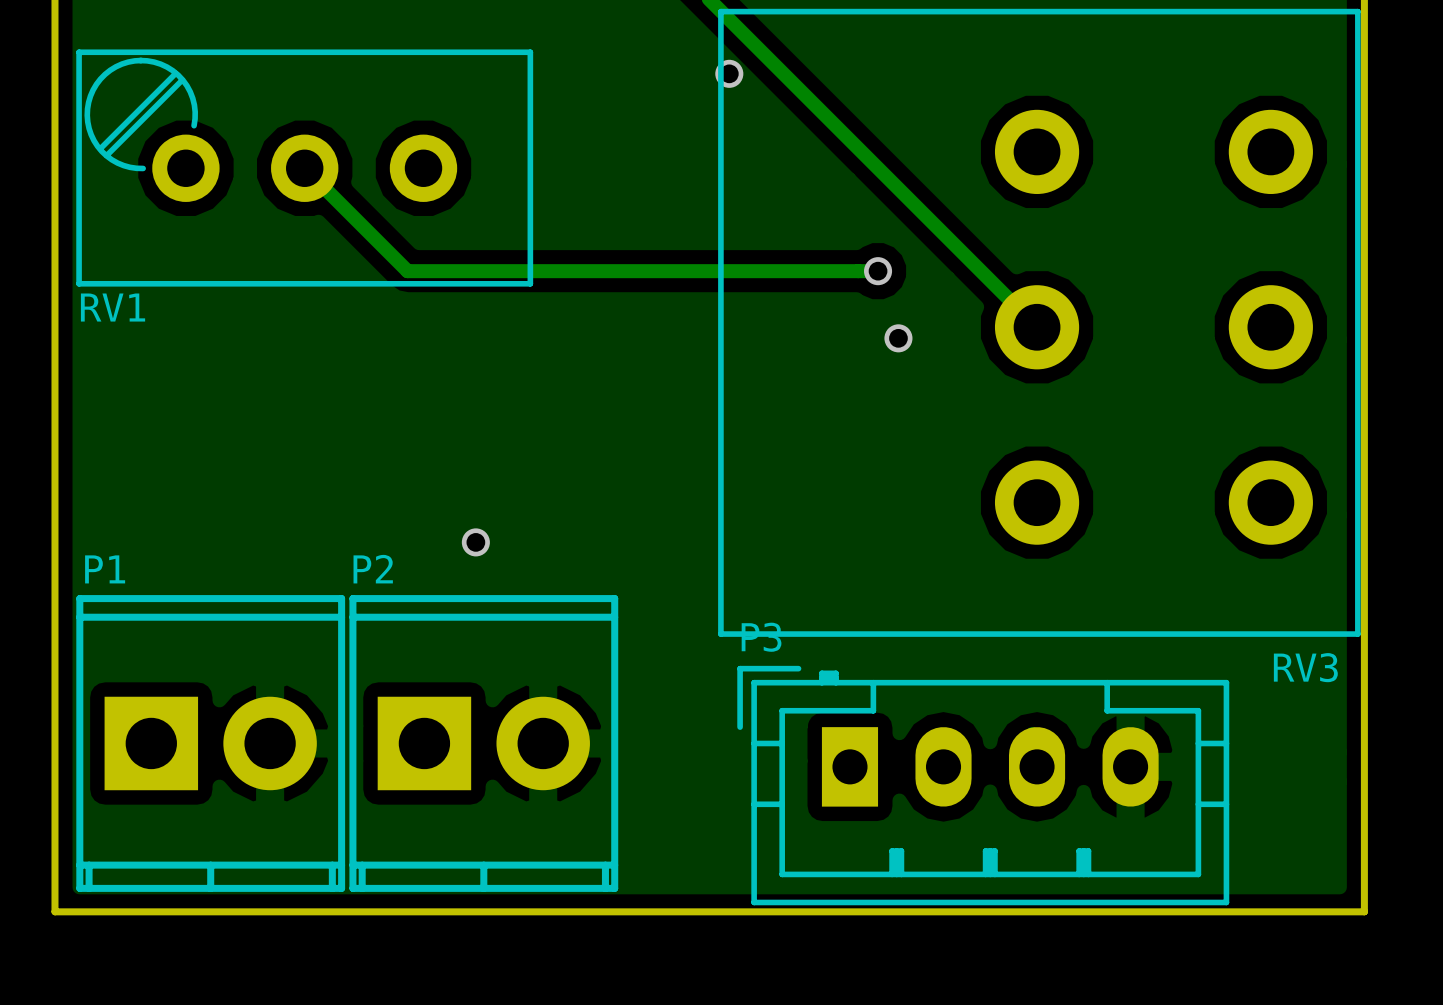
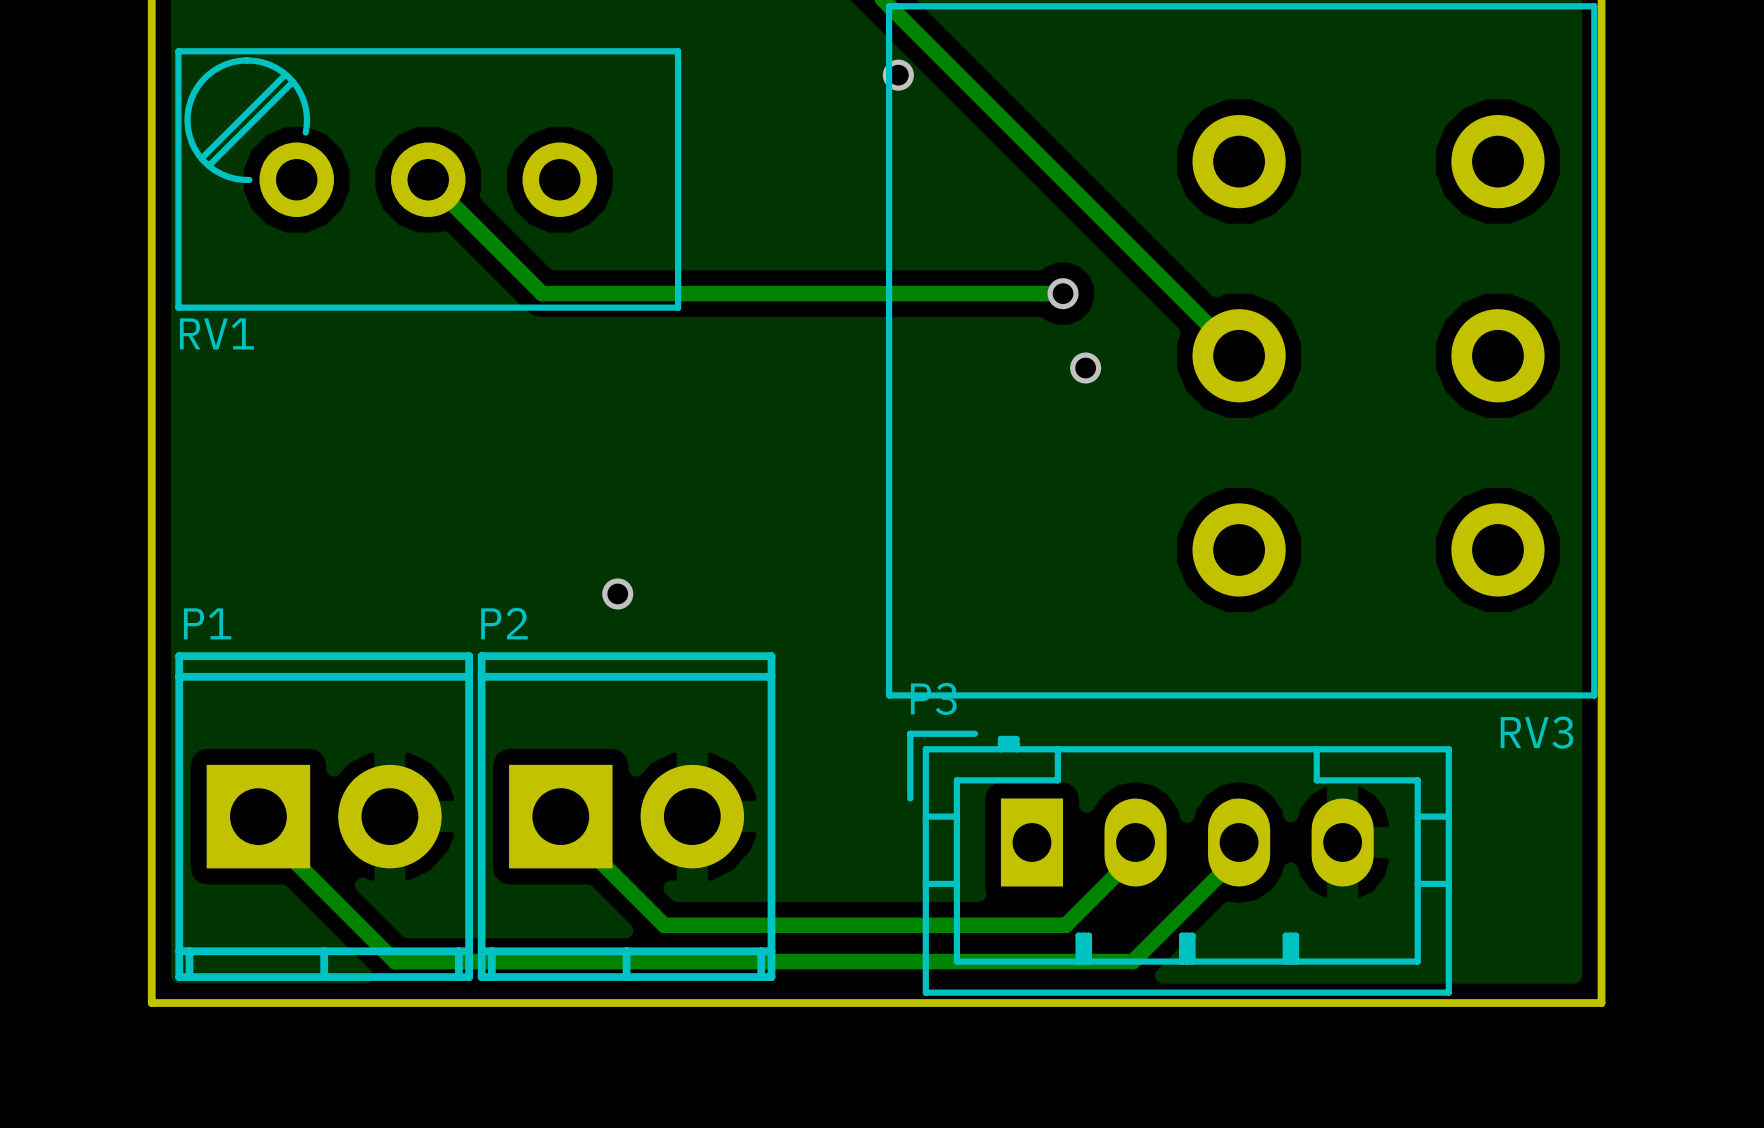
track: none -> (258, 816) (258, 824) (395, 961) (1132, 961) (1239, 855) (1239, 842)
track: none -> (560, 816) (560, 821) (664, 925) (1065, 925) (1135, 855) (1135, 842)

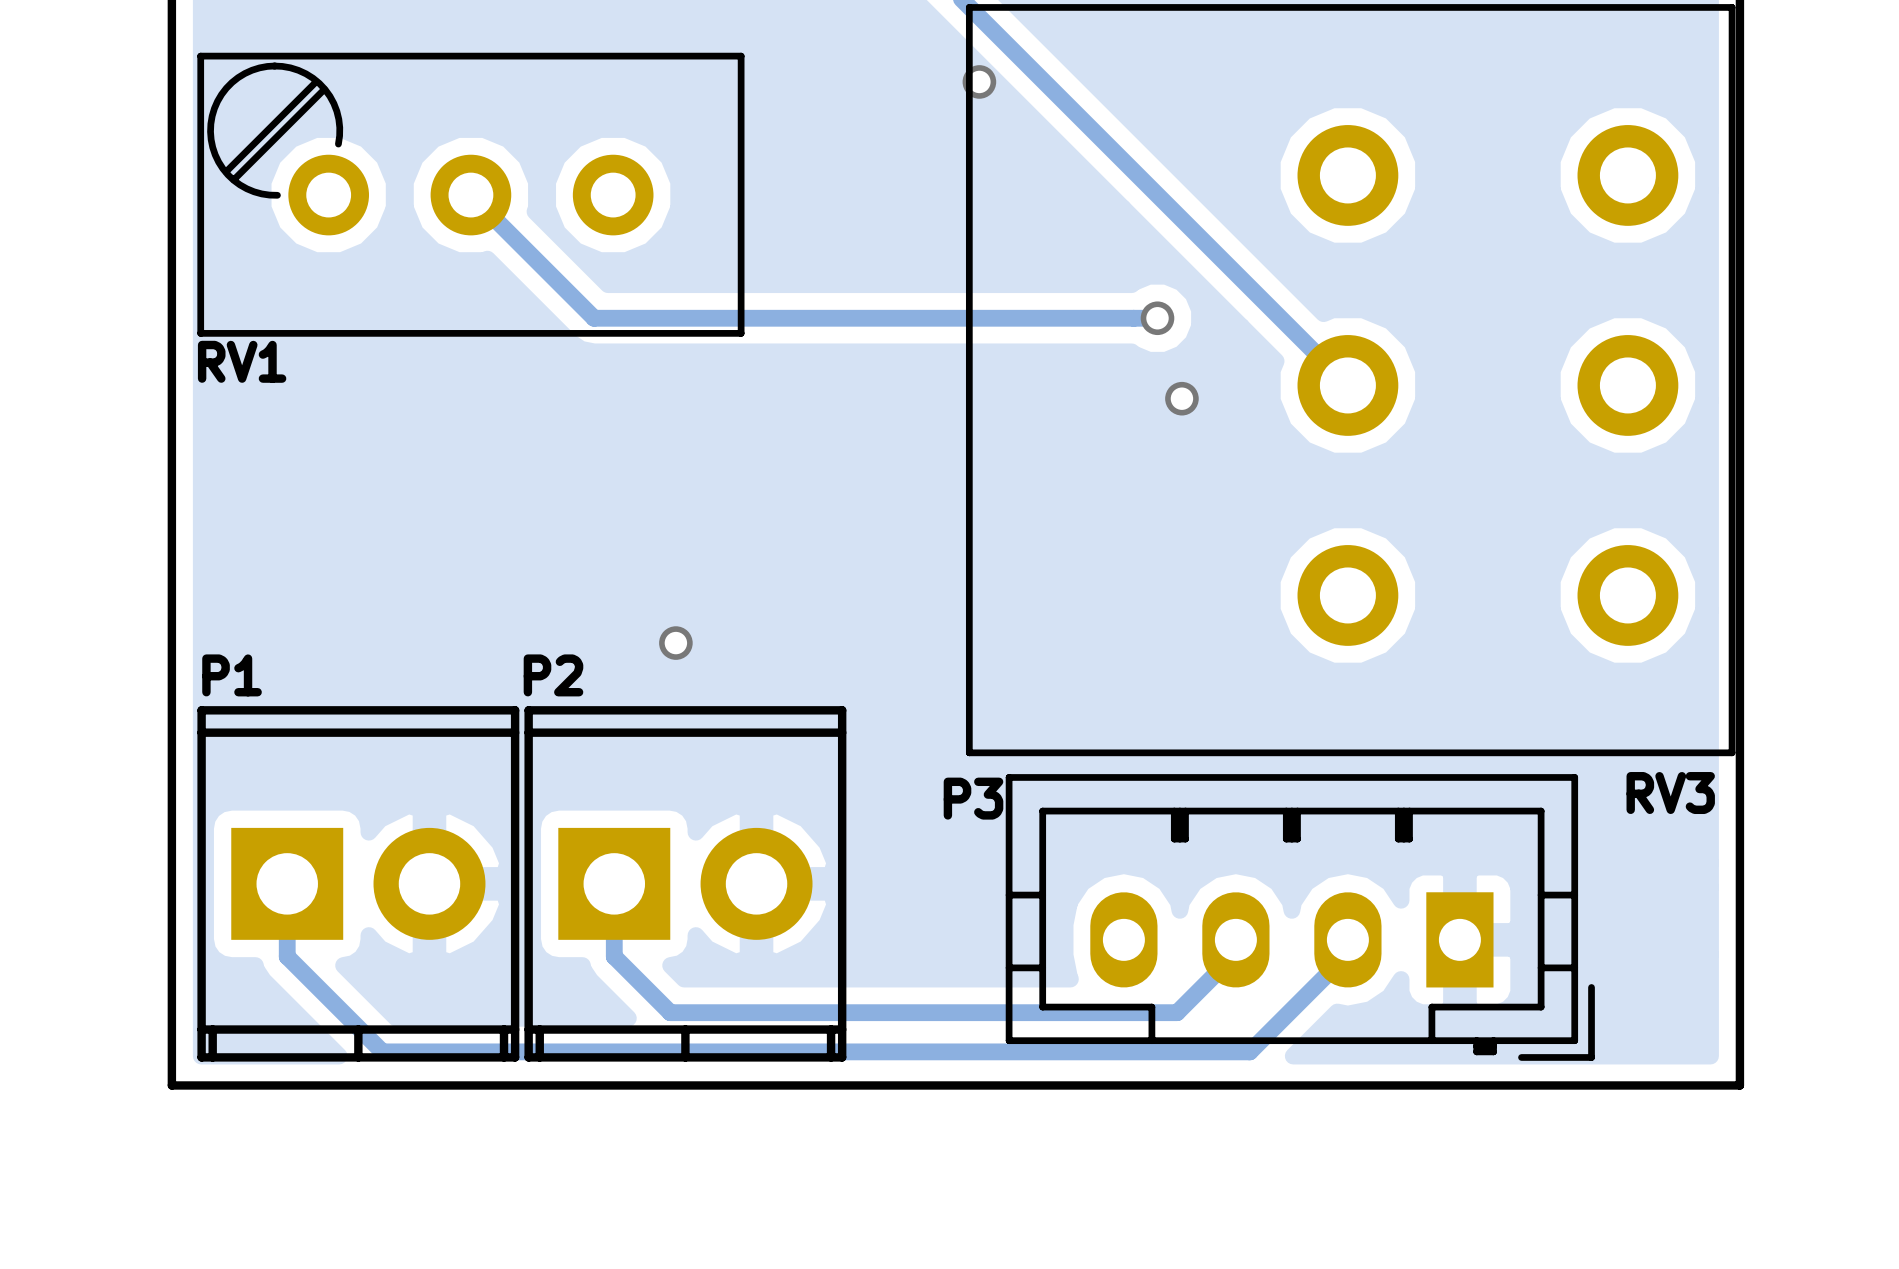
track: (560, 821) (664, 925) (1065, 925) (1135, 855) -> (614, 889) (614, 956) (670, 1012) (1177, 1012) (1235, 953) (1235, 939)
track: (258, 824) (395, 961) (1132, 961) (1239, 855) -> (287, 892) (287, 956) (382, 1051) (1249, 1051) (1347, 953) (1347, 939)
P3 rotation: 0° (1179, 863) -> 180° (1300, 917)

